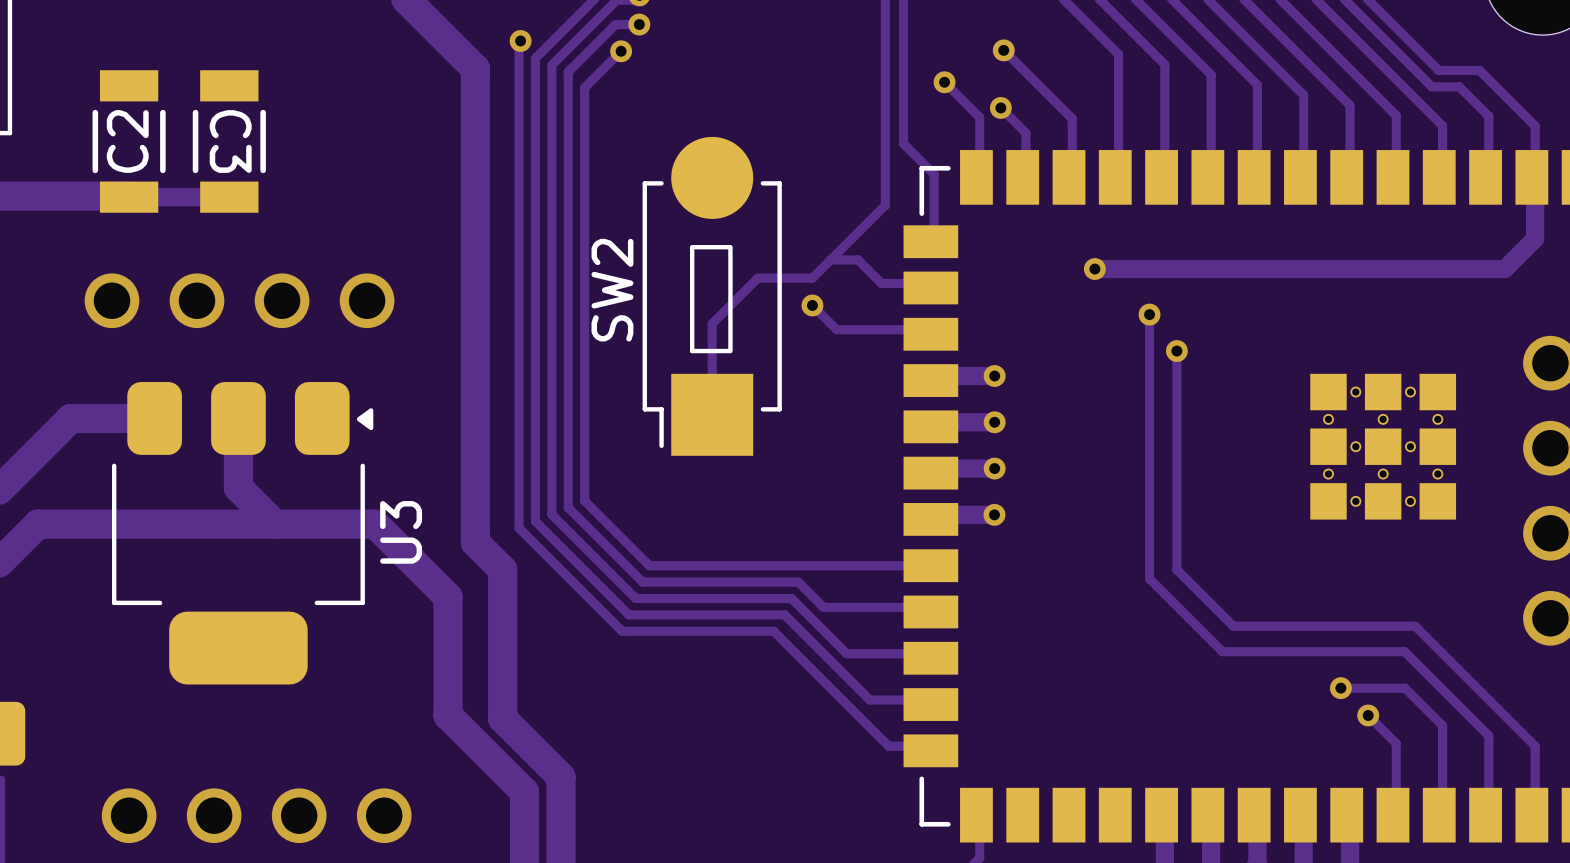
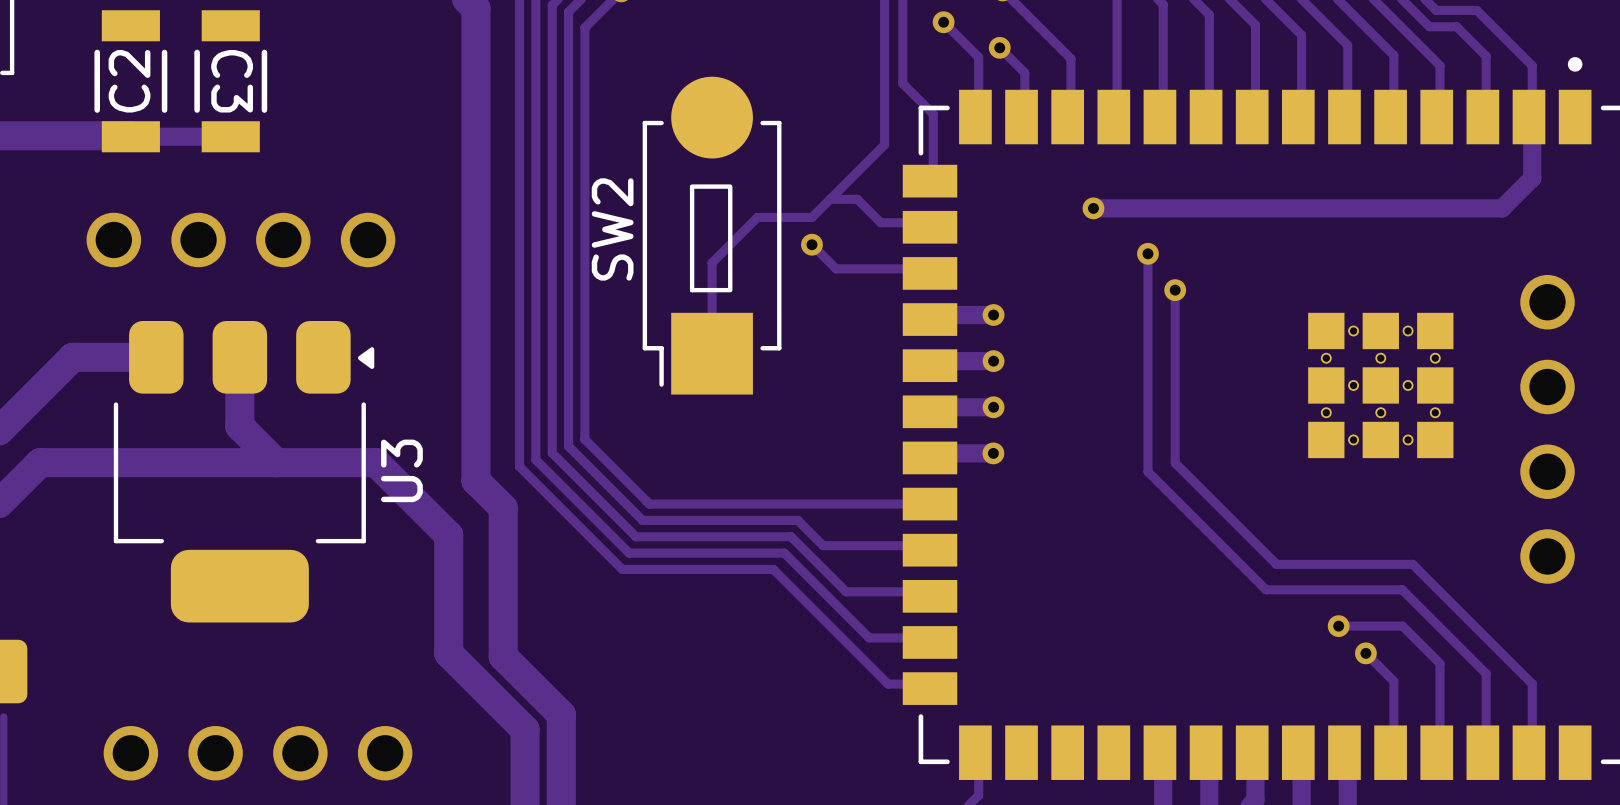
track: (1176, 524) (1176, 569) (1233, 626) (1278, 626) -> (1175, 463) (1276, 564)
track: (1149, 533) (1149, 578) (1222, 651) (1267, 651) -> (1147, 471) (1266, 589)

